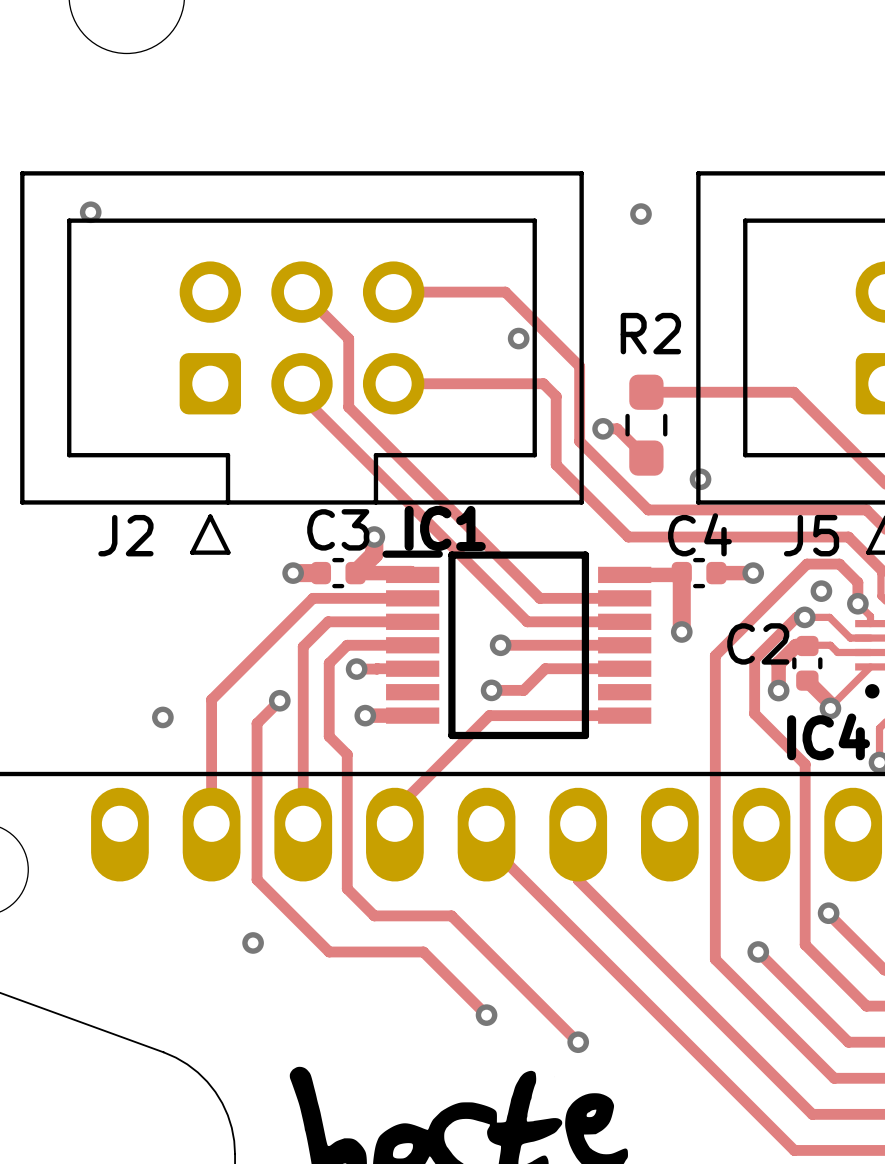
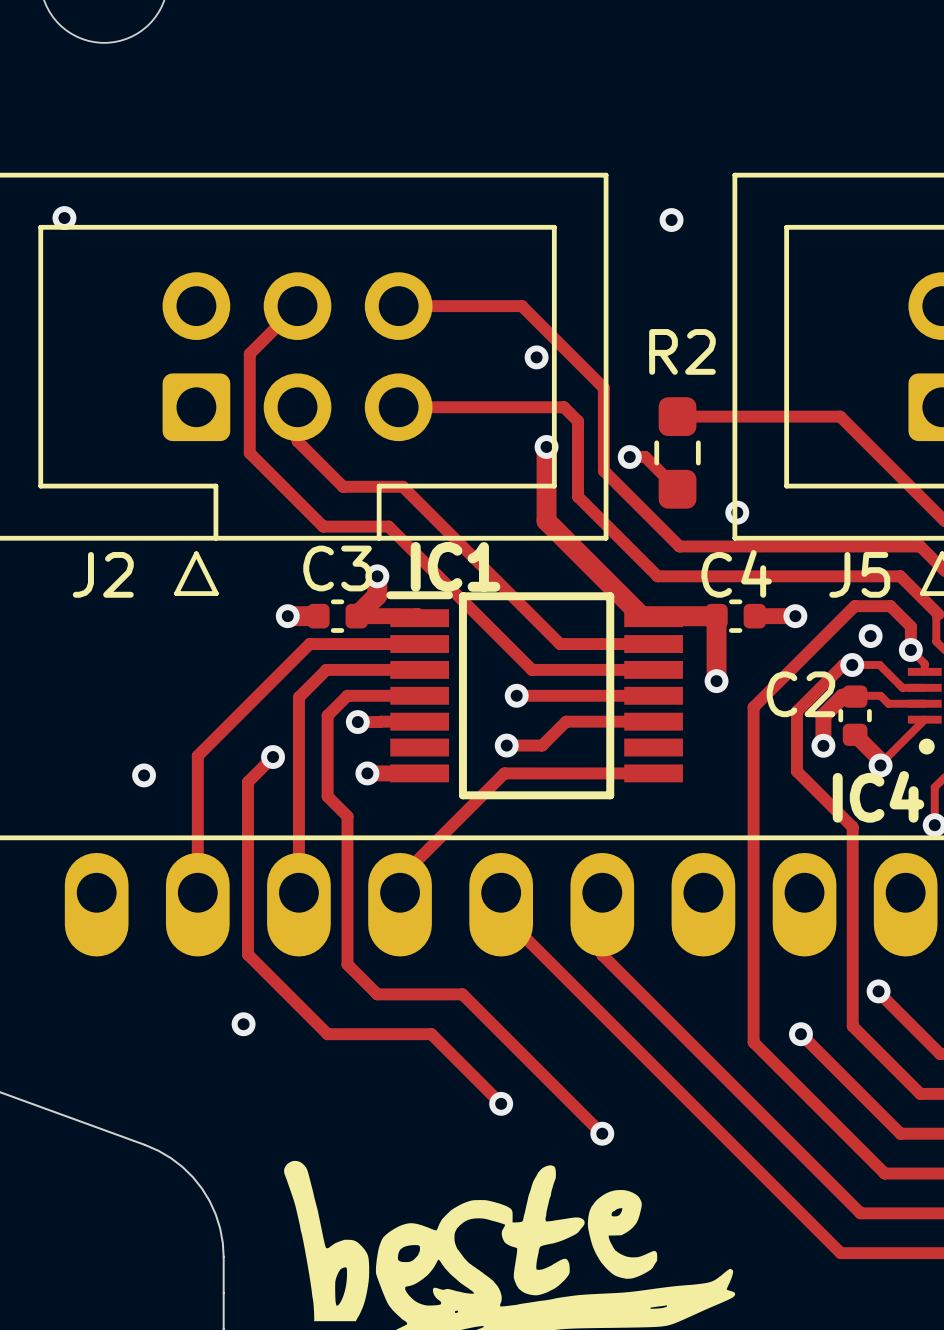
top track: (301, 292) (348, 338) (348, 407) (397, 455) -> (297, 421) (297, 441) (343, 486) (402, 486)
top track: (301, 396) (527, 621) -> (297, 306) (249, 353) (249, 453) (323, 526) (388, 526) (532, 669) (546, 669)
top track: none -> (546, 446) (546, 521) (641, 616) (716, 616)
via: none -> (546, 446)

